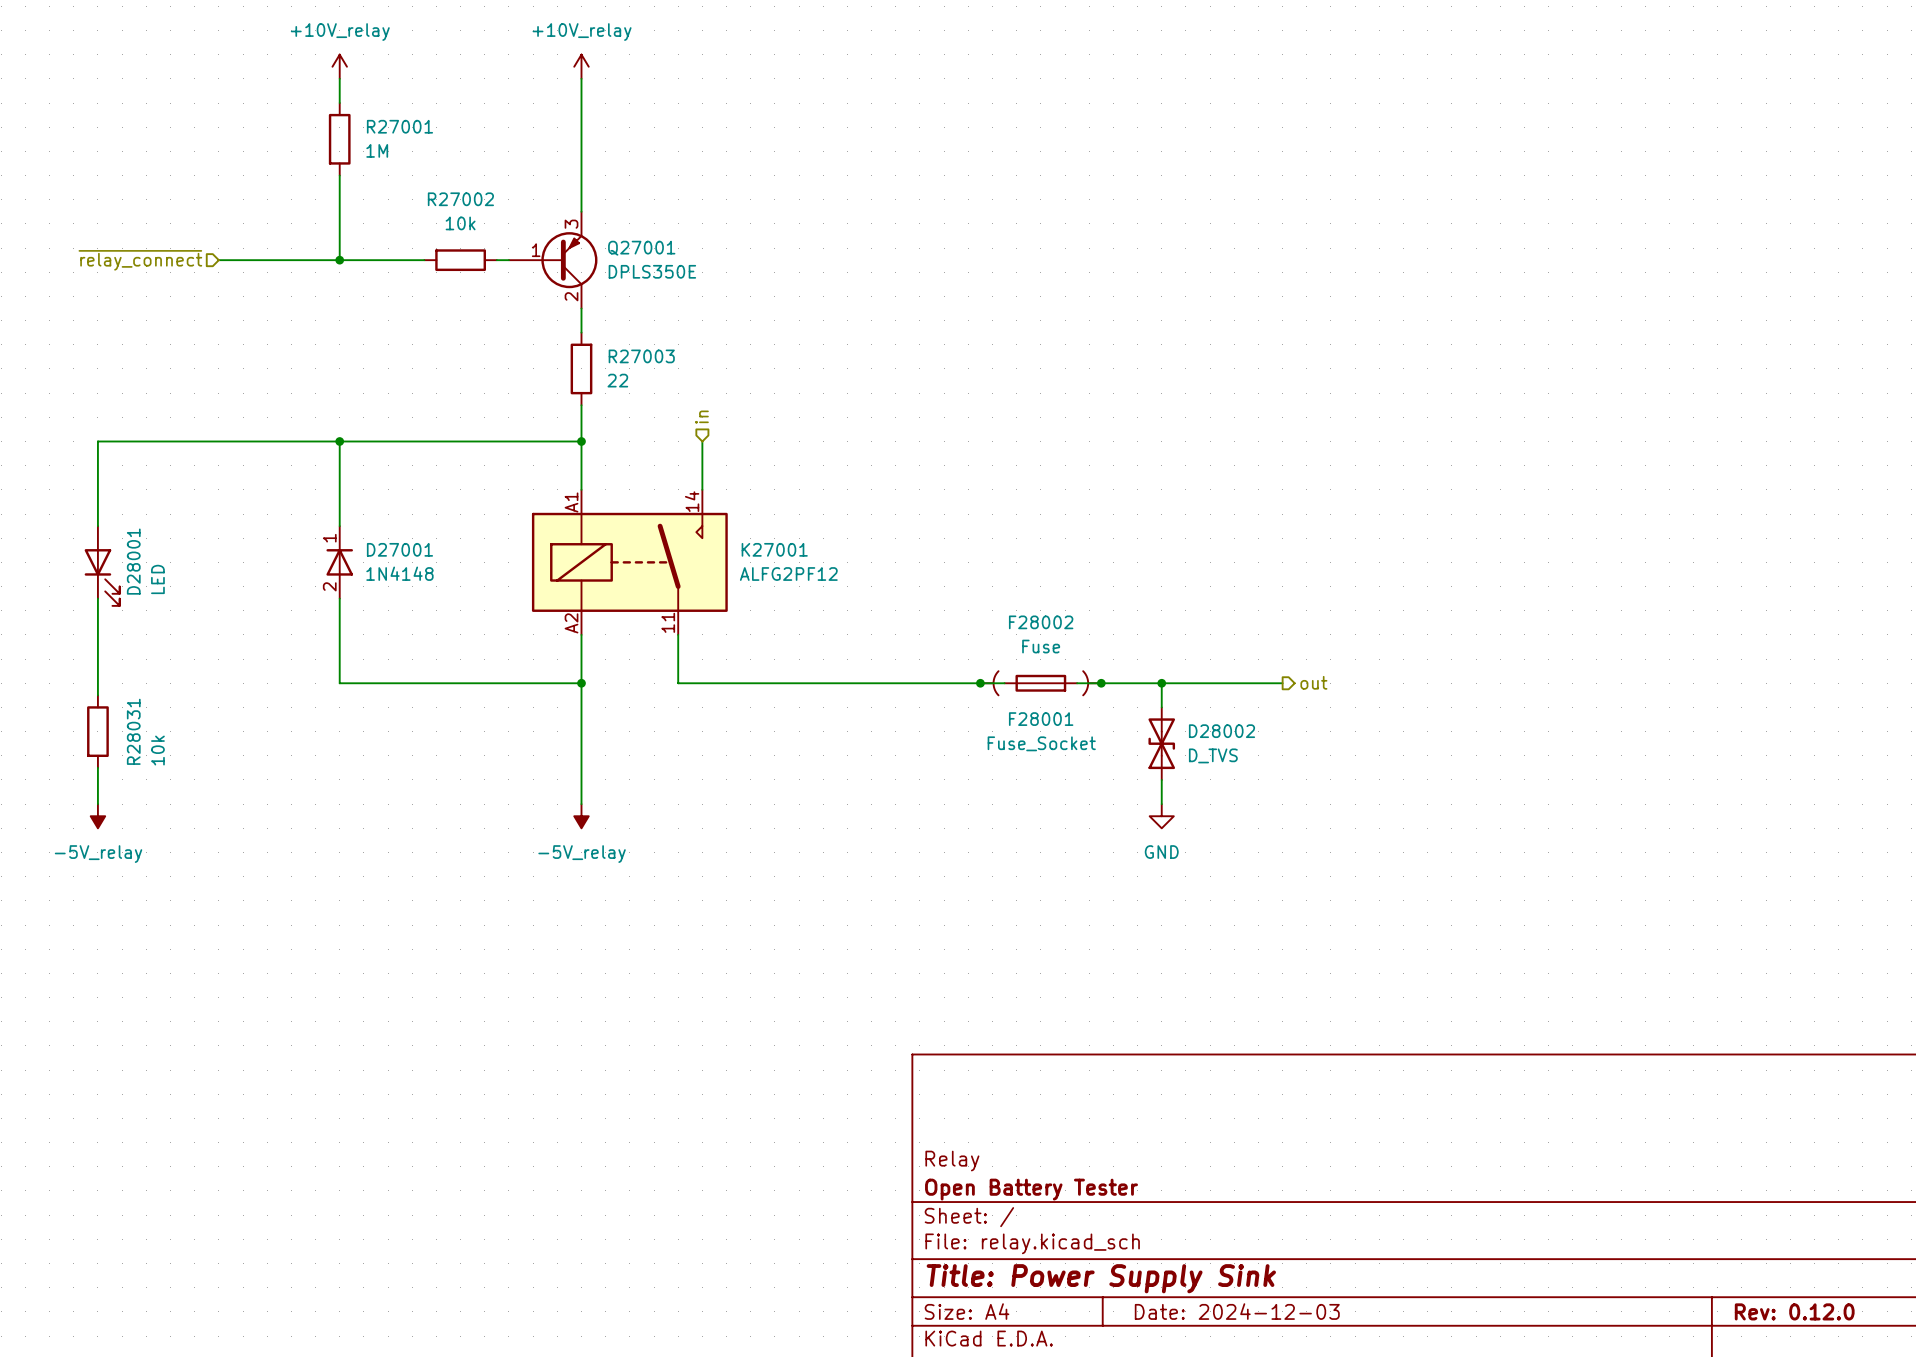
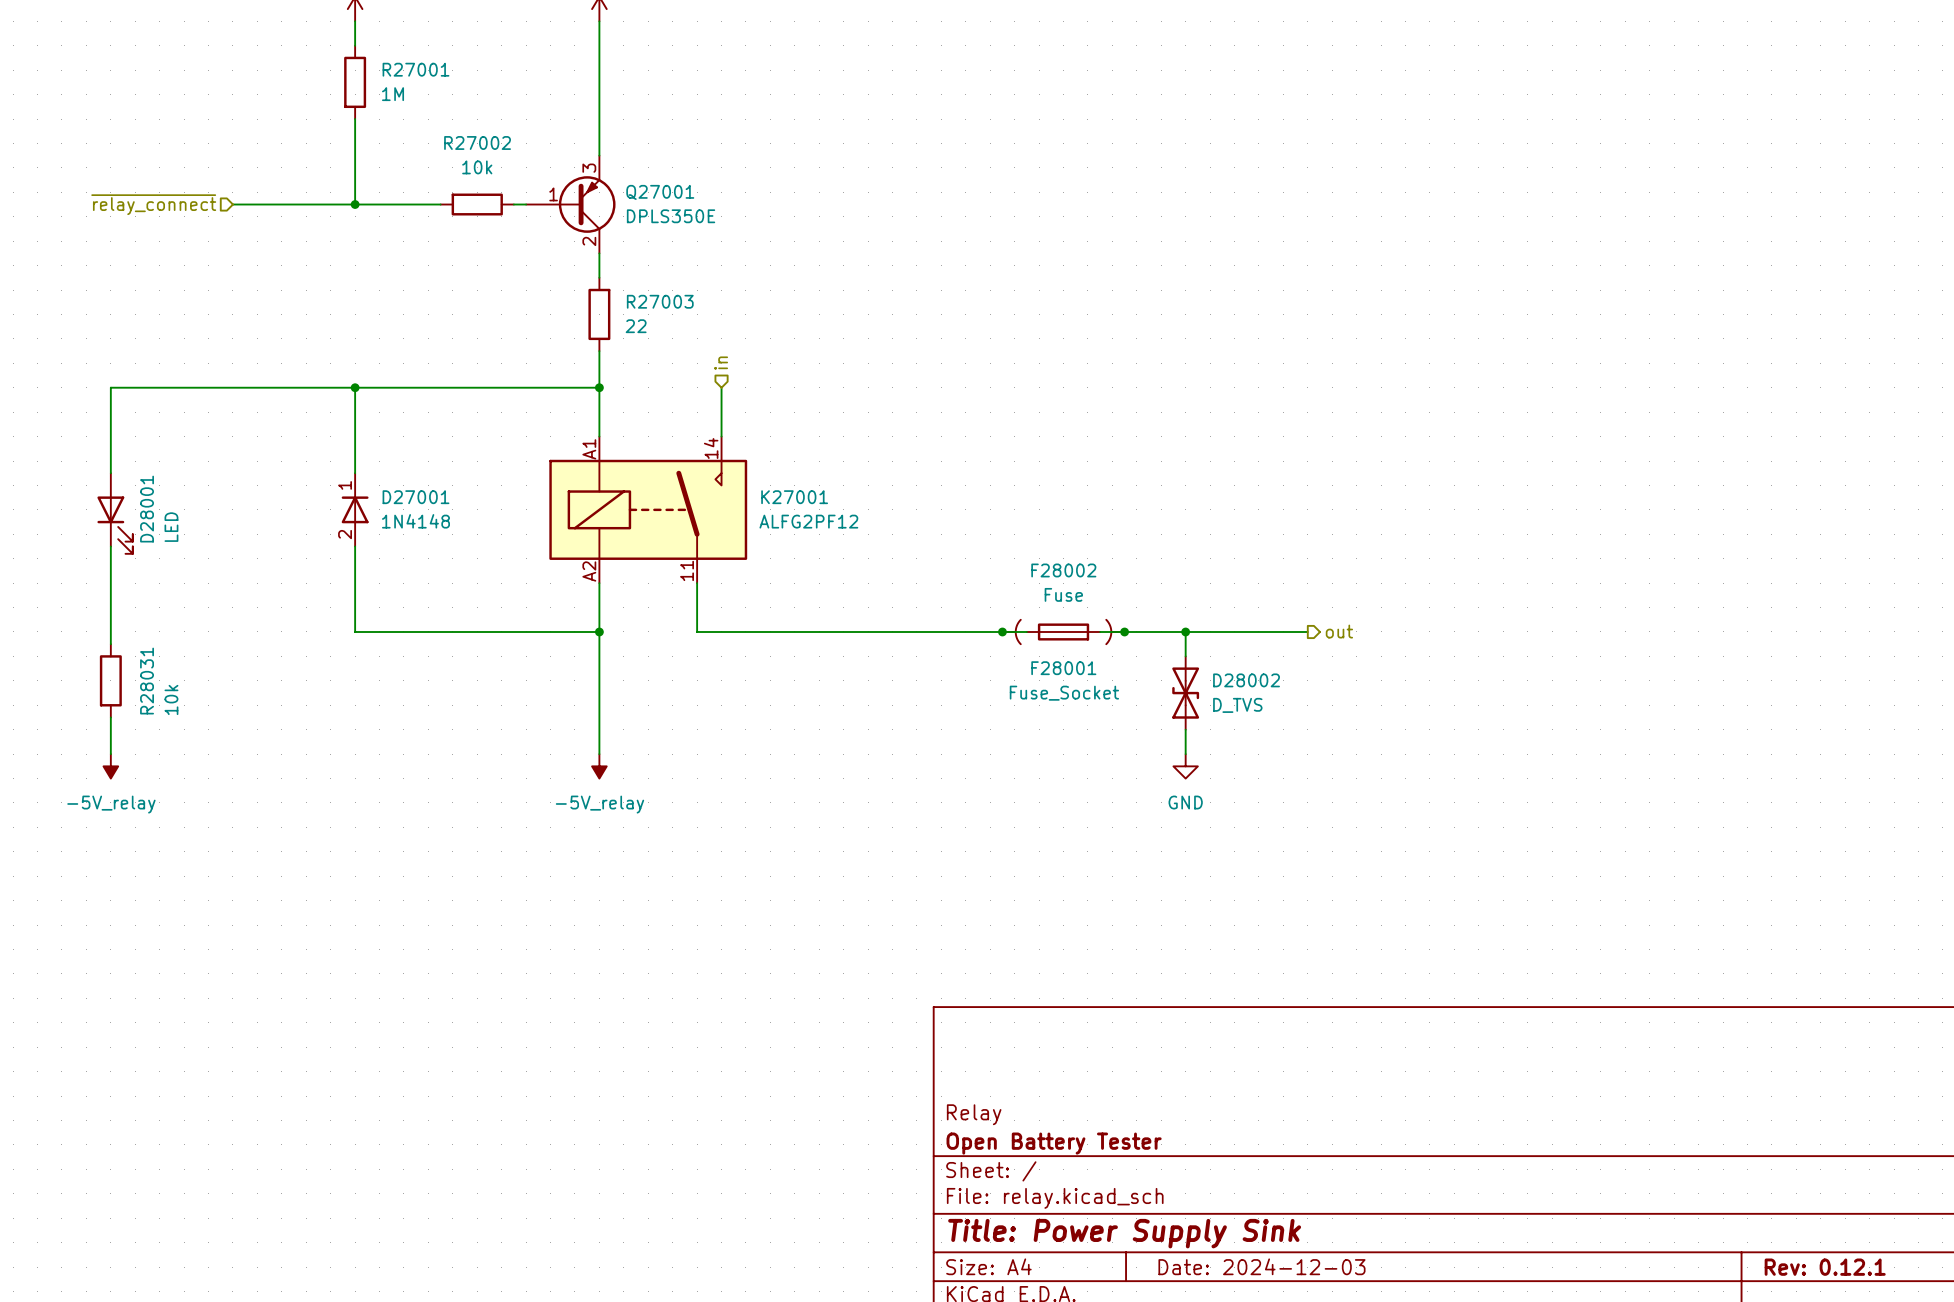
title block: Rev: 0.12.0 (1794, 1311) -> Rev: 0.12.1 (1825, 1267)

